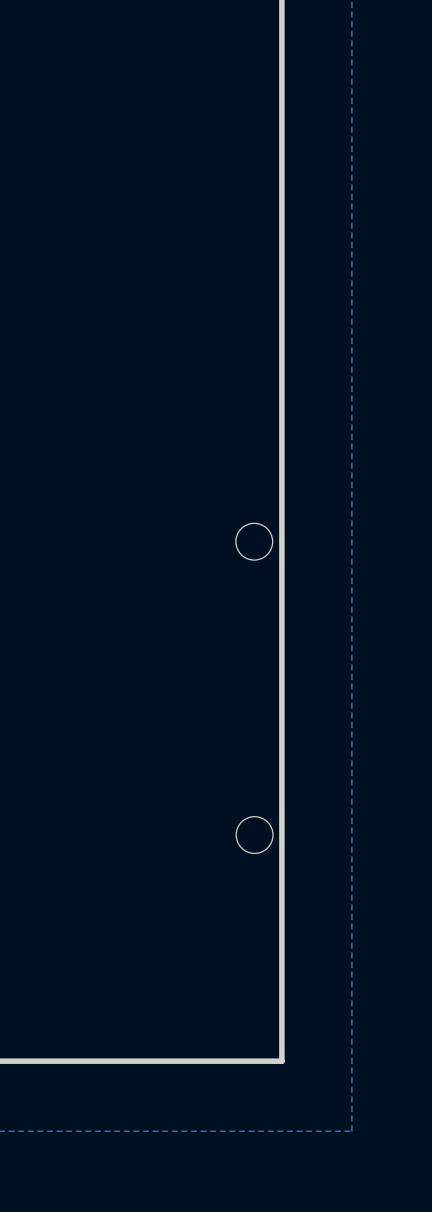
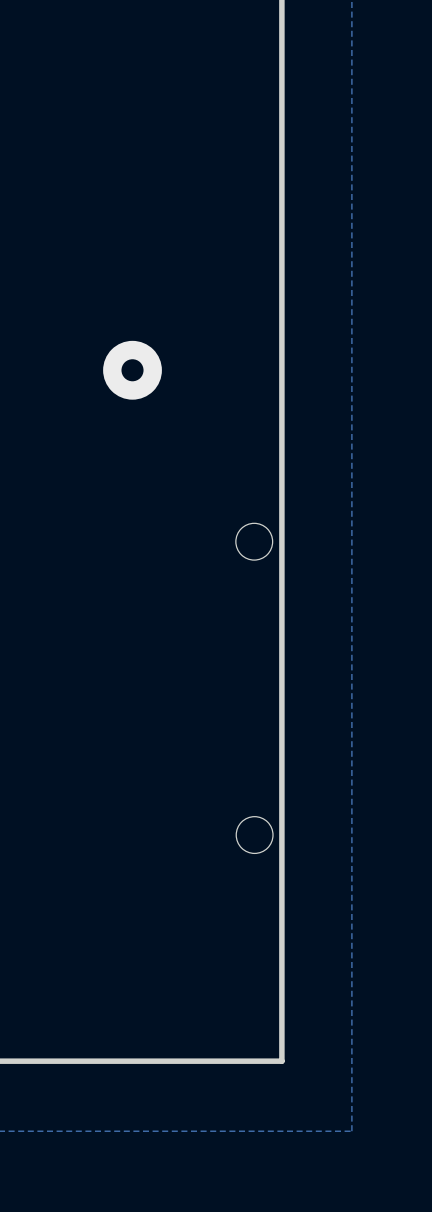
via: none -> (132, 370)

